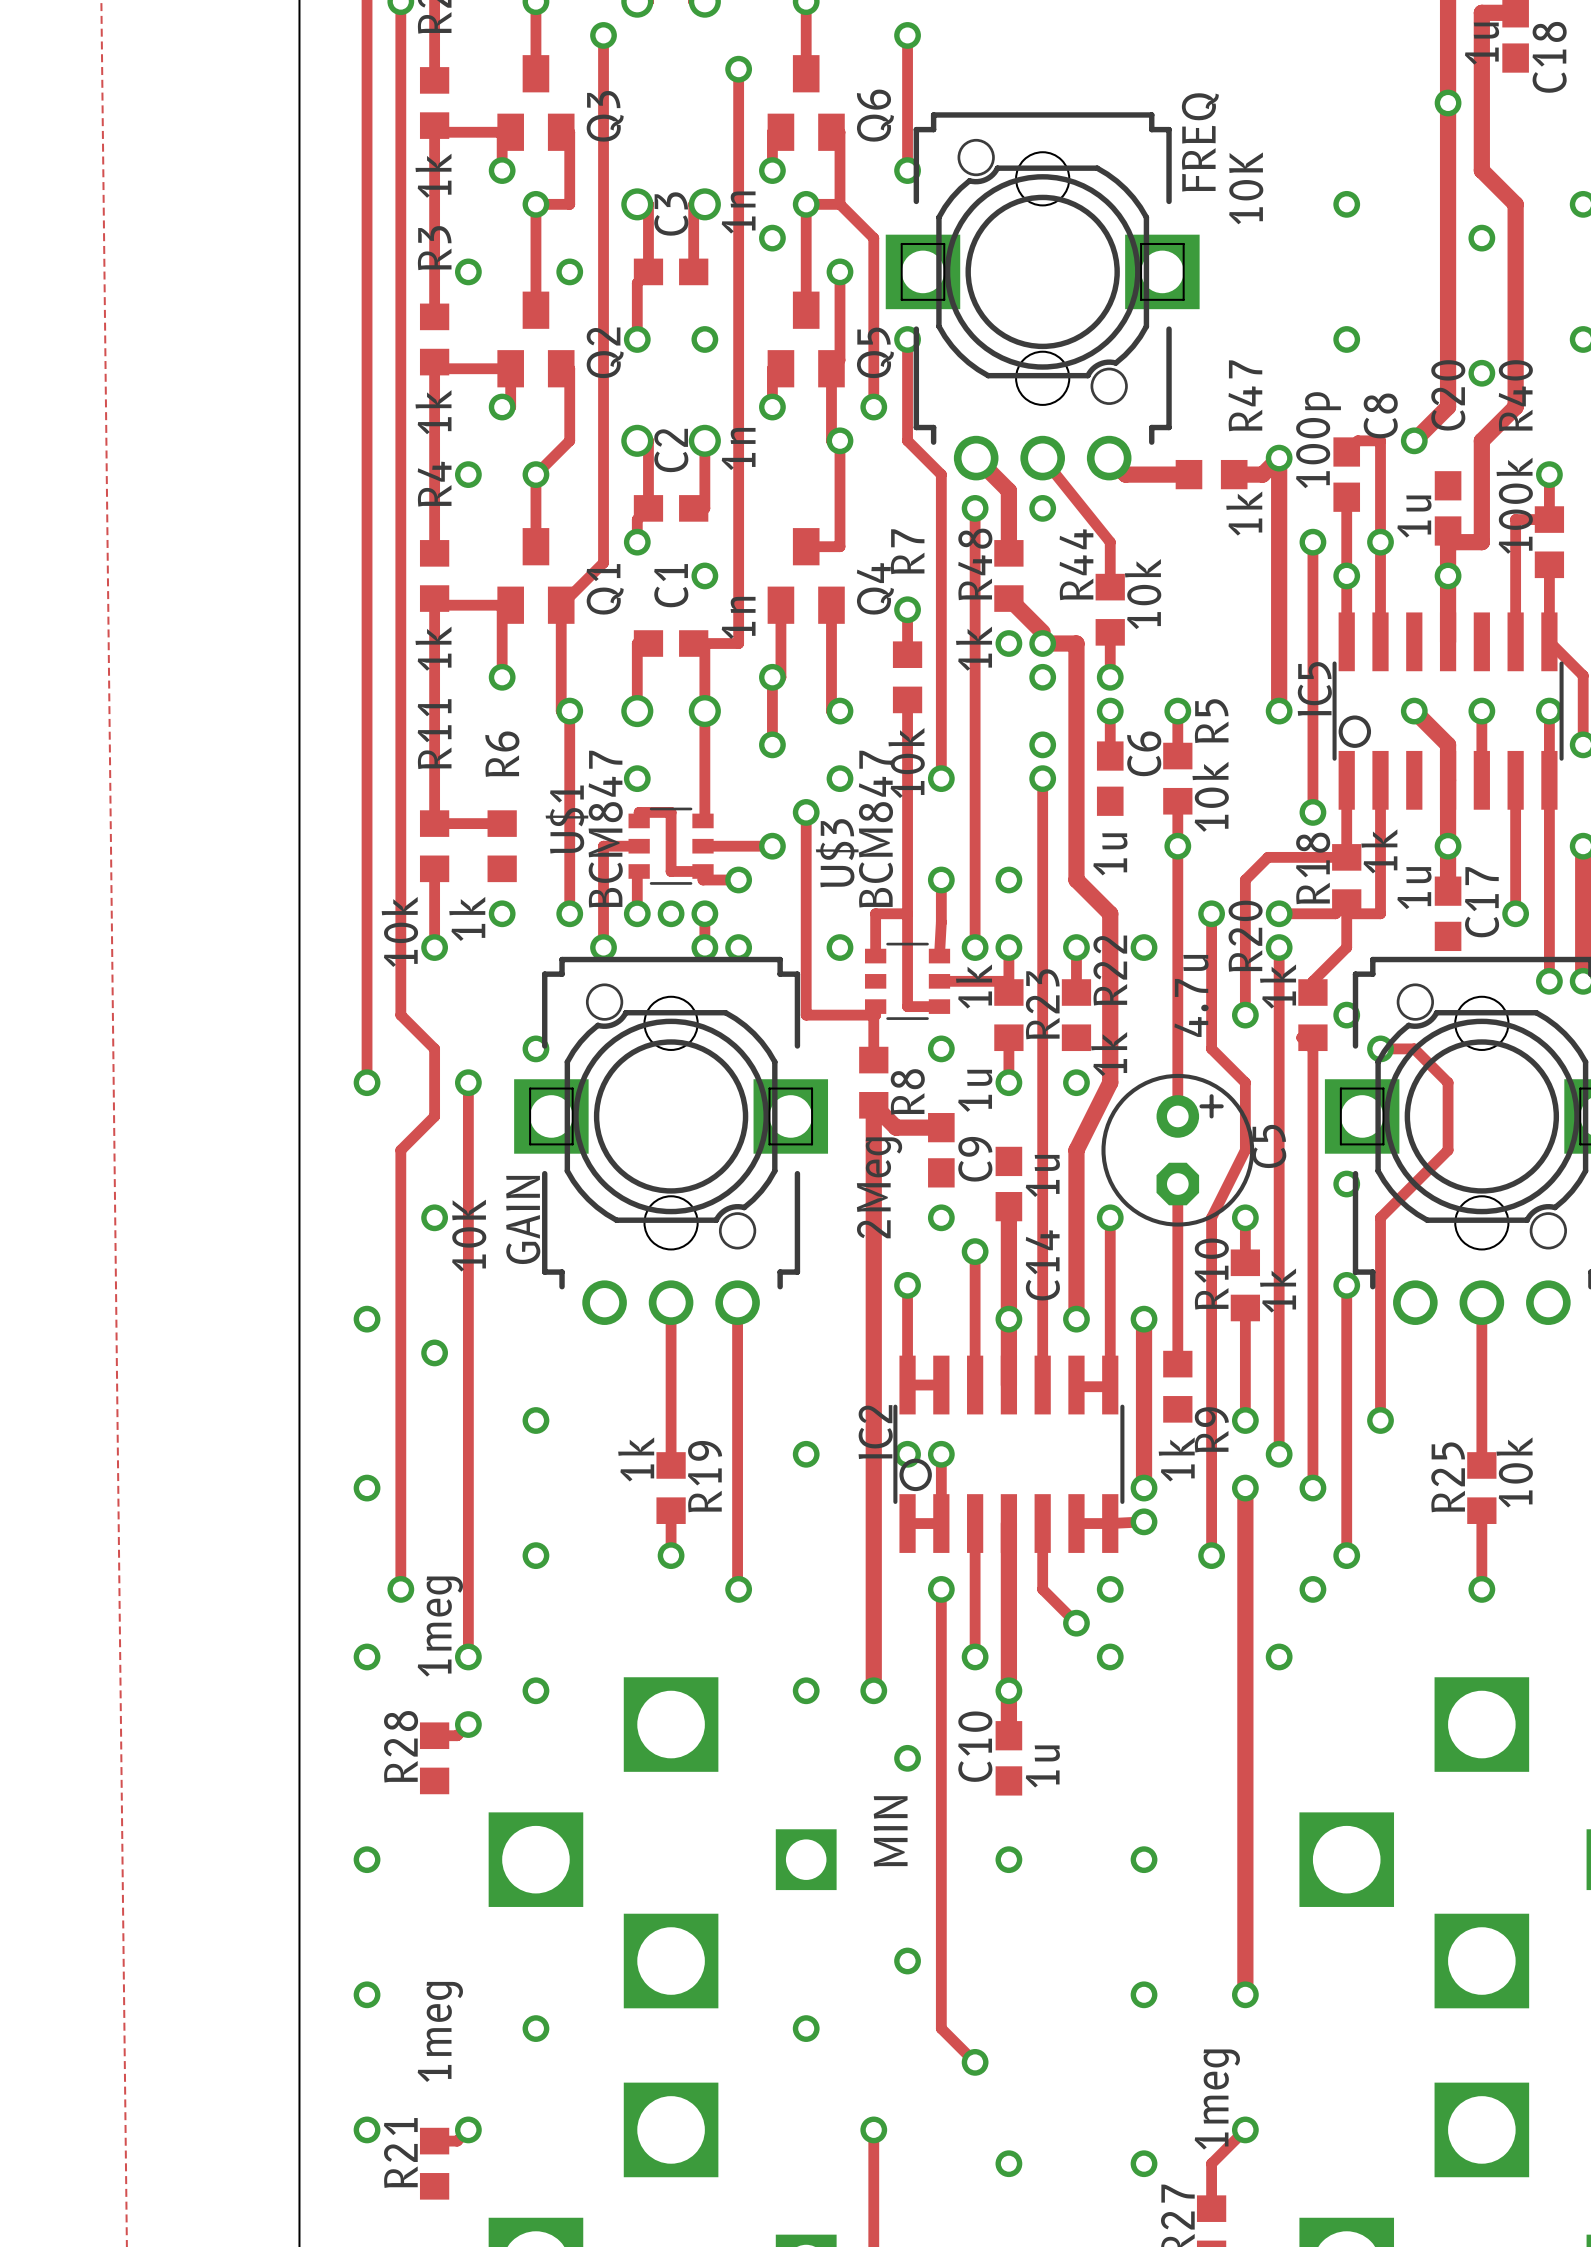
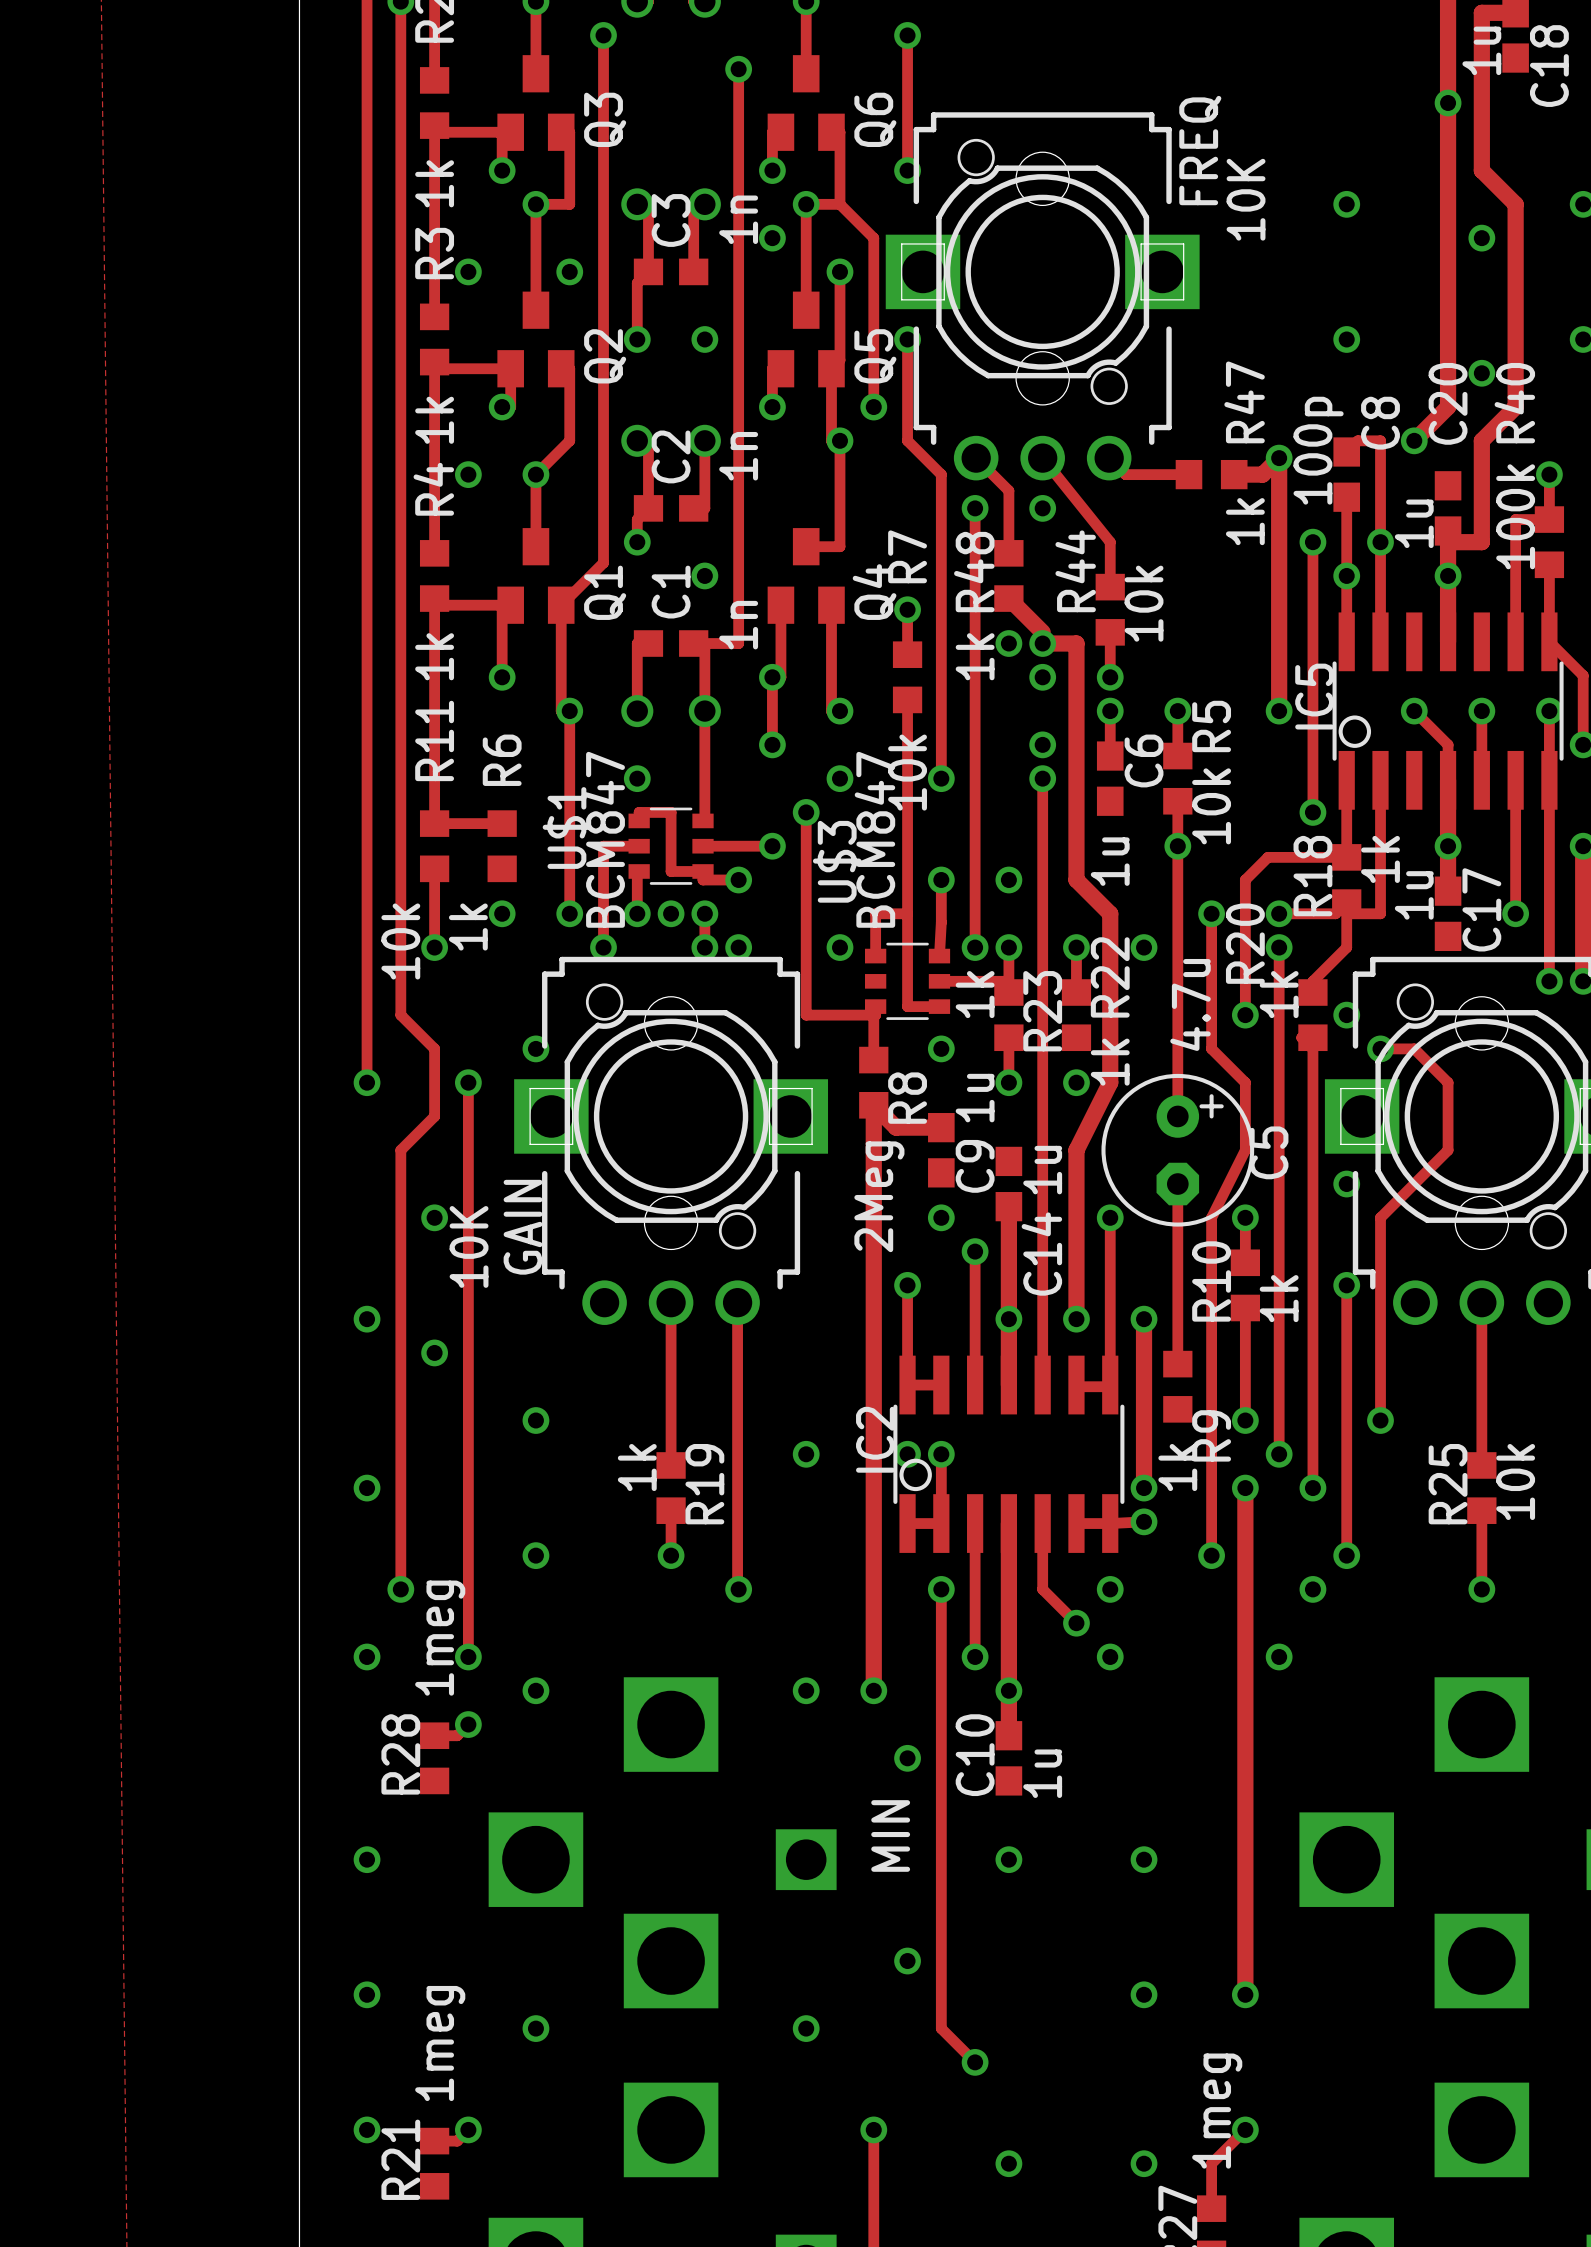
track width: thick (976, 458) (1008, 490) (1008, 553) -> thin (976, 458) (1008, 490) (1008, 553)
track width: thick (1109, 458) (1125, 474) (1188, 474) -> thin (1109, 458) (1125, 474) (1188, 474)
track width: thick (1414, 711) (1448, 744) (1448, 780) -> thin (1414, 711) (1448, 744) (1448, 780)

